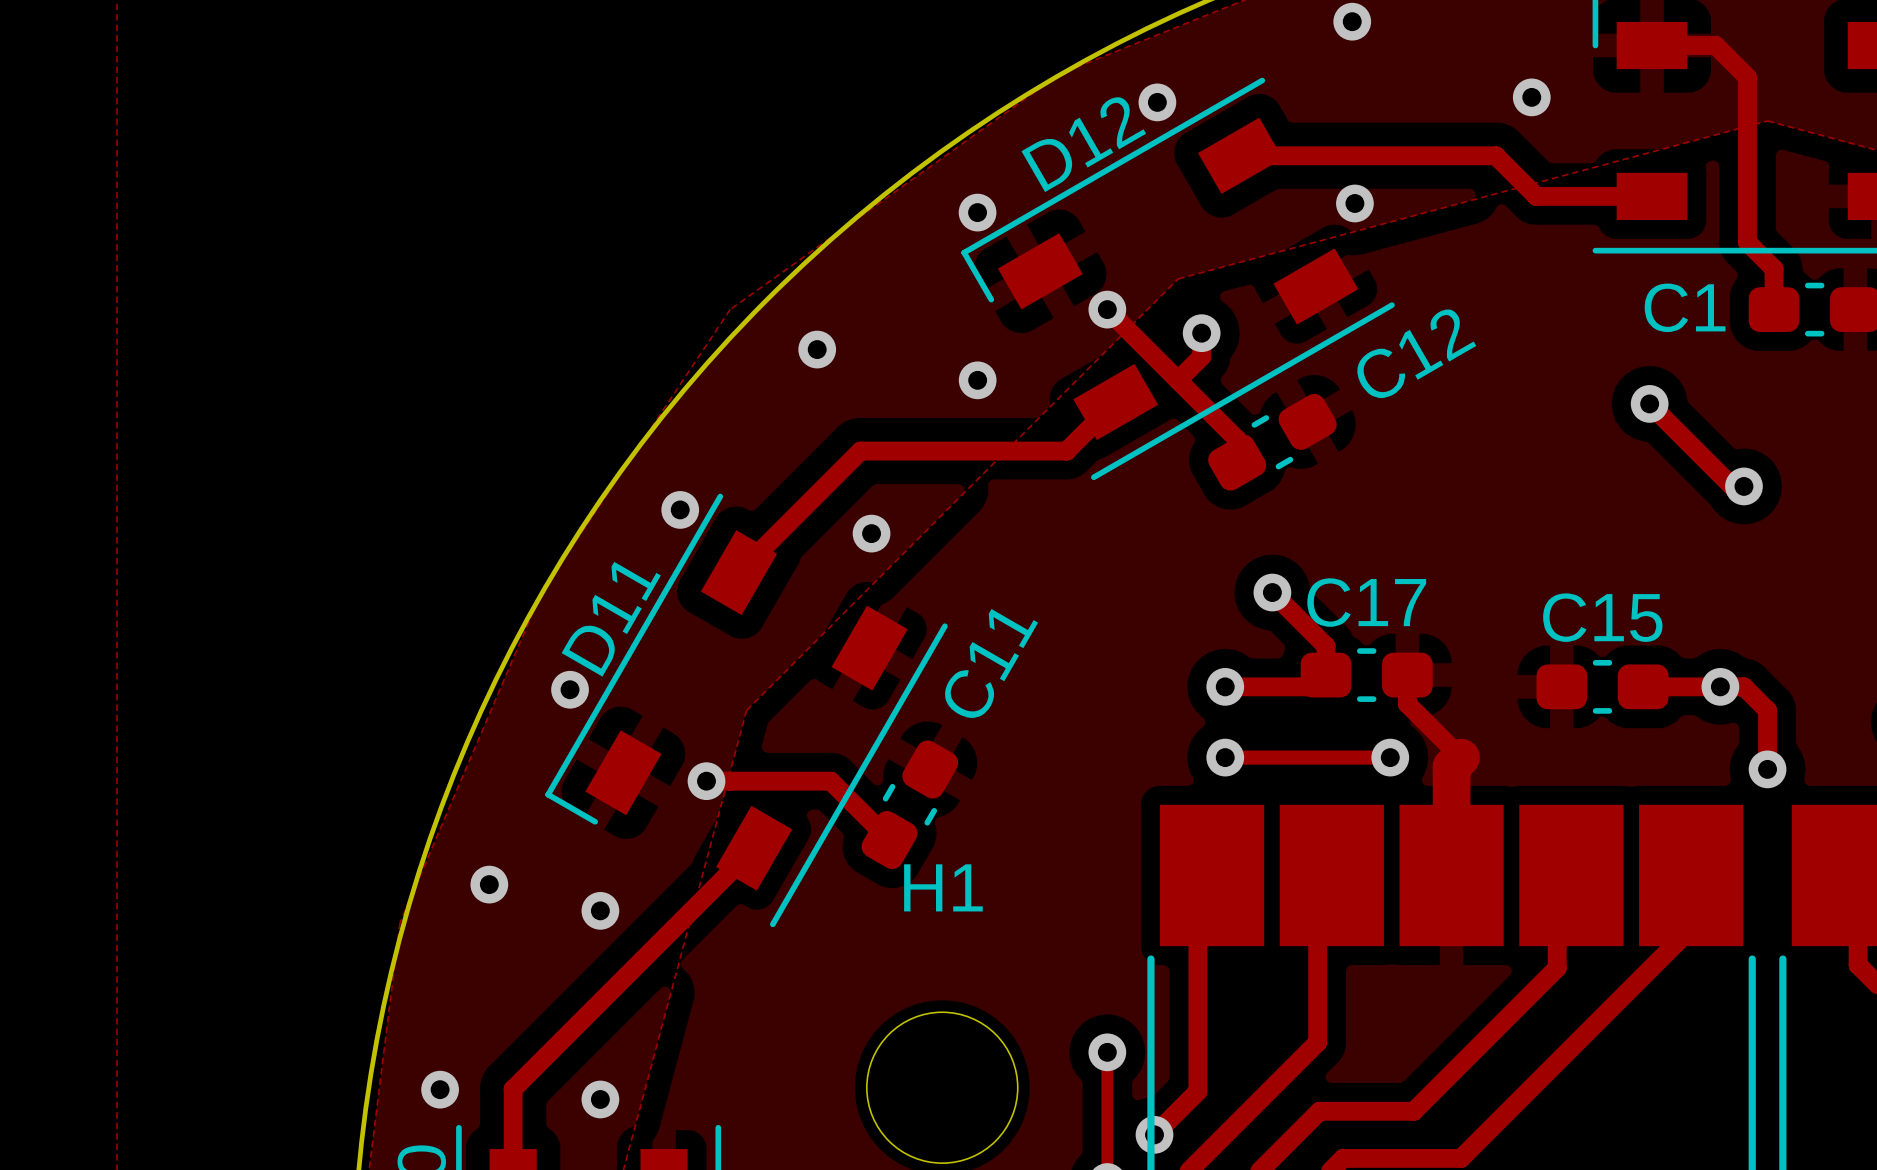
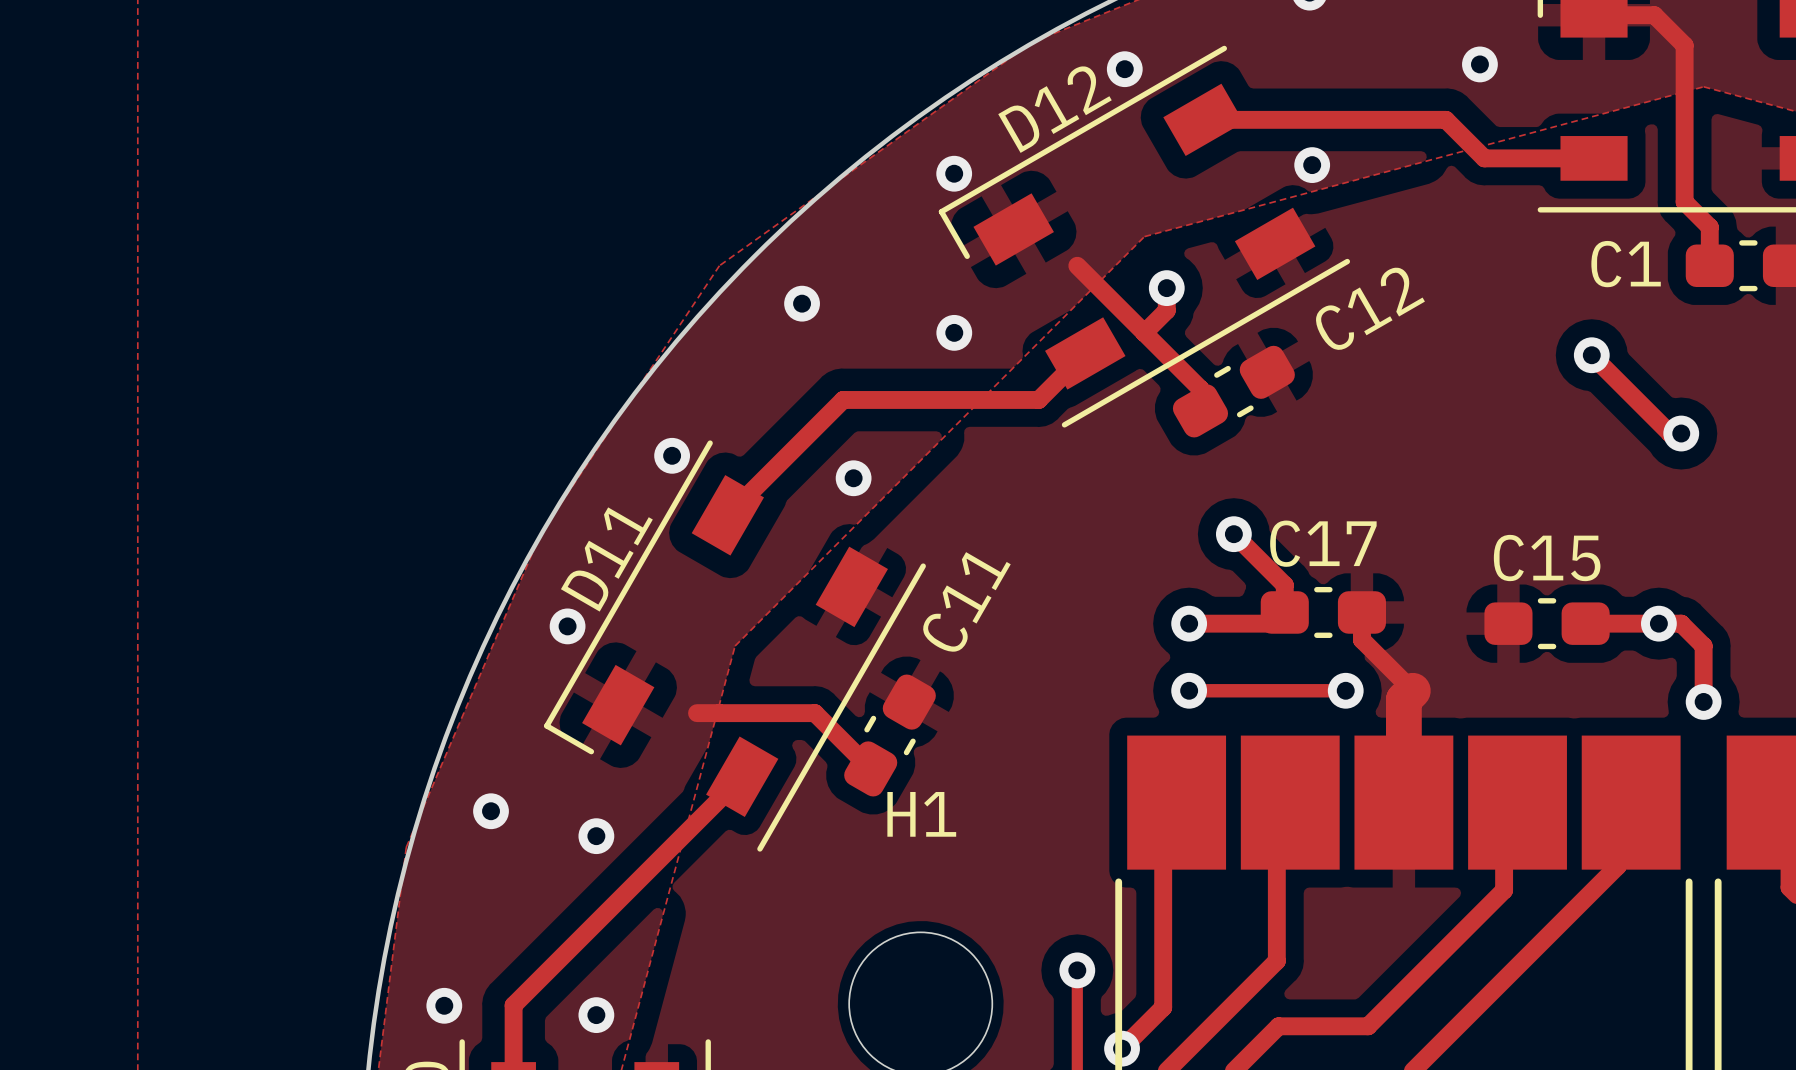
via: (1107, 309) -> none
via: (706, 781) -> none

